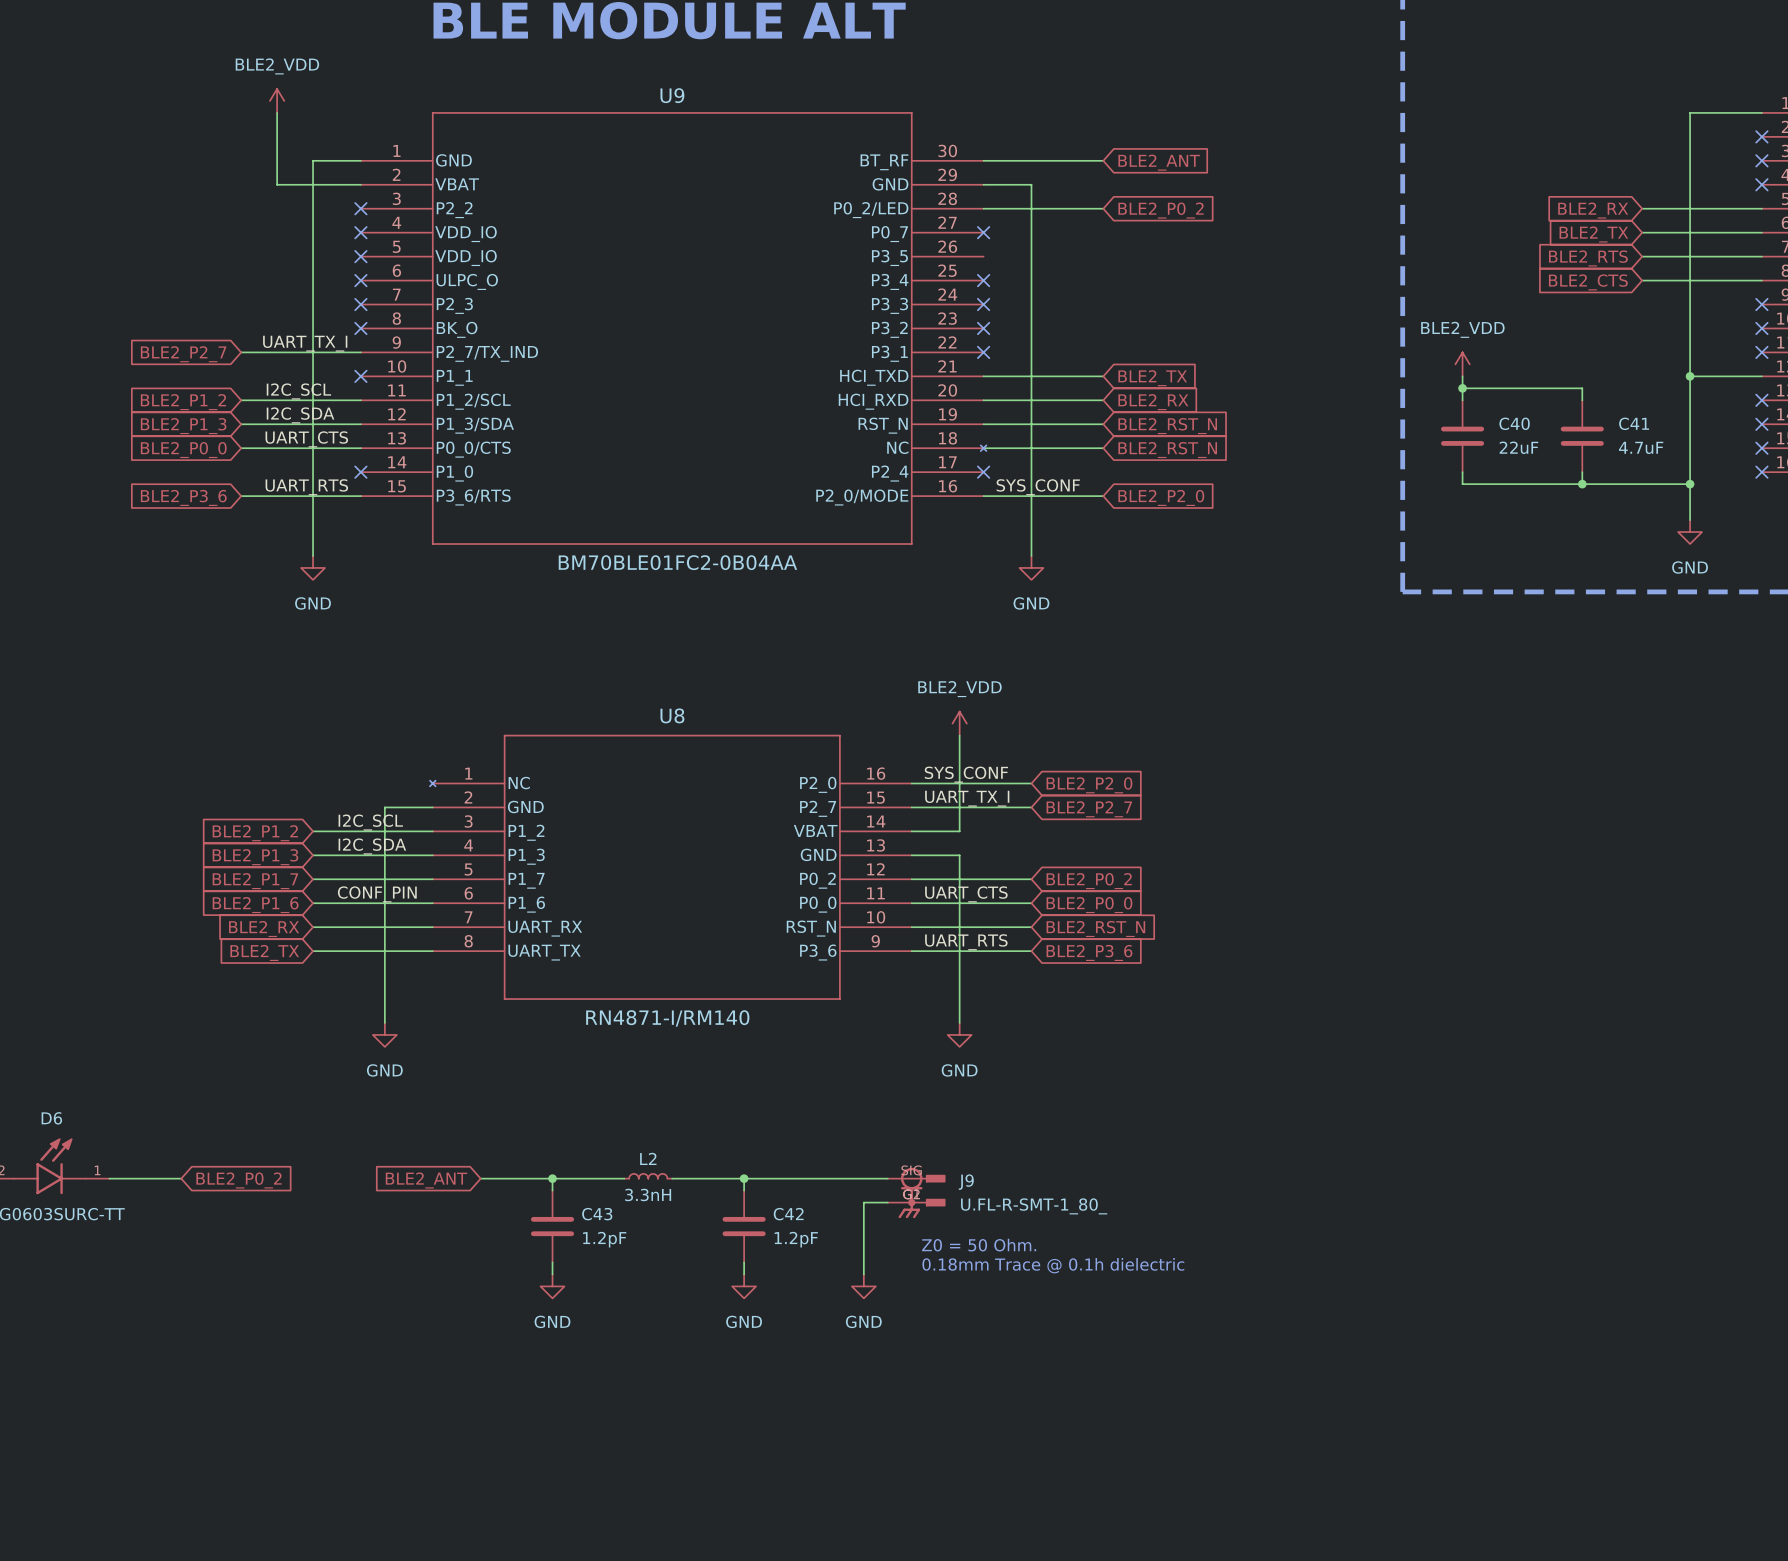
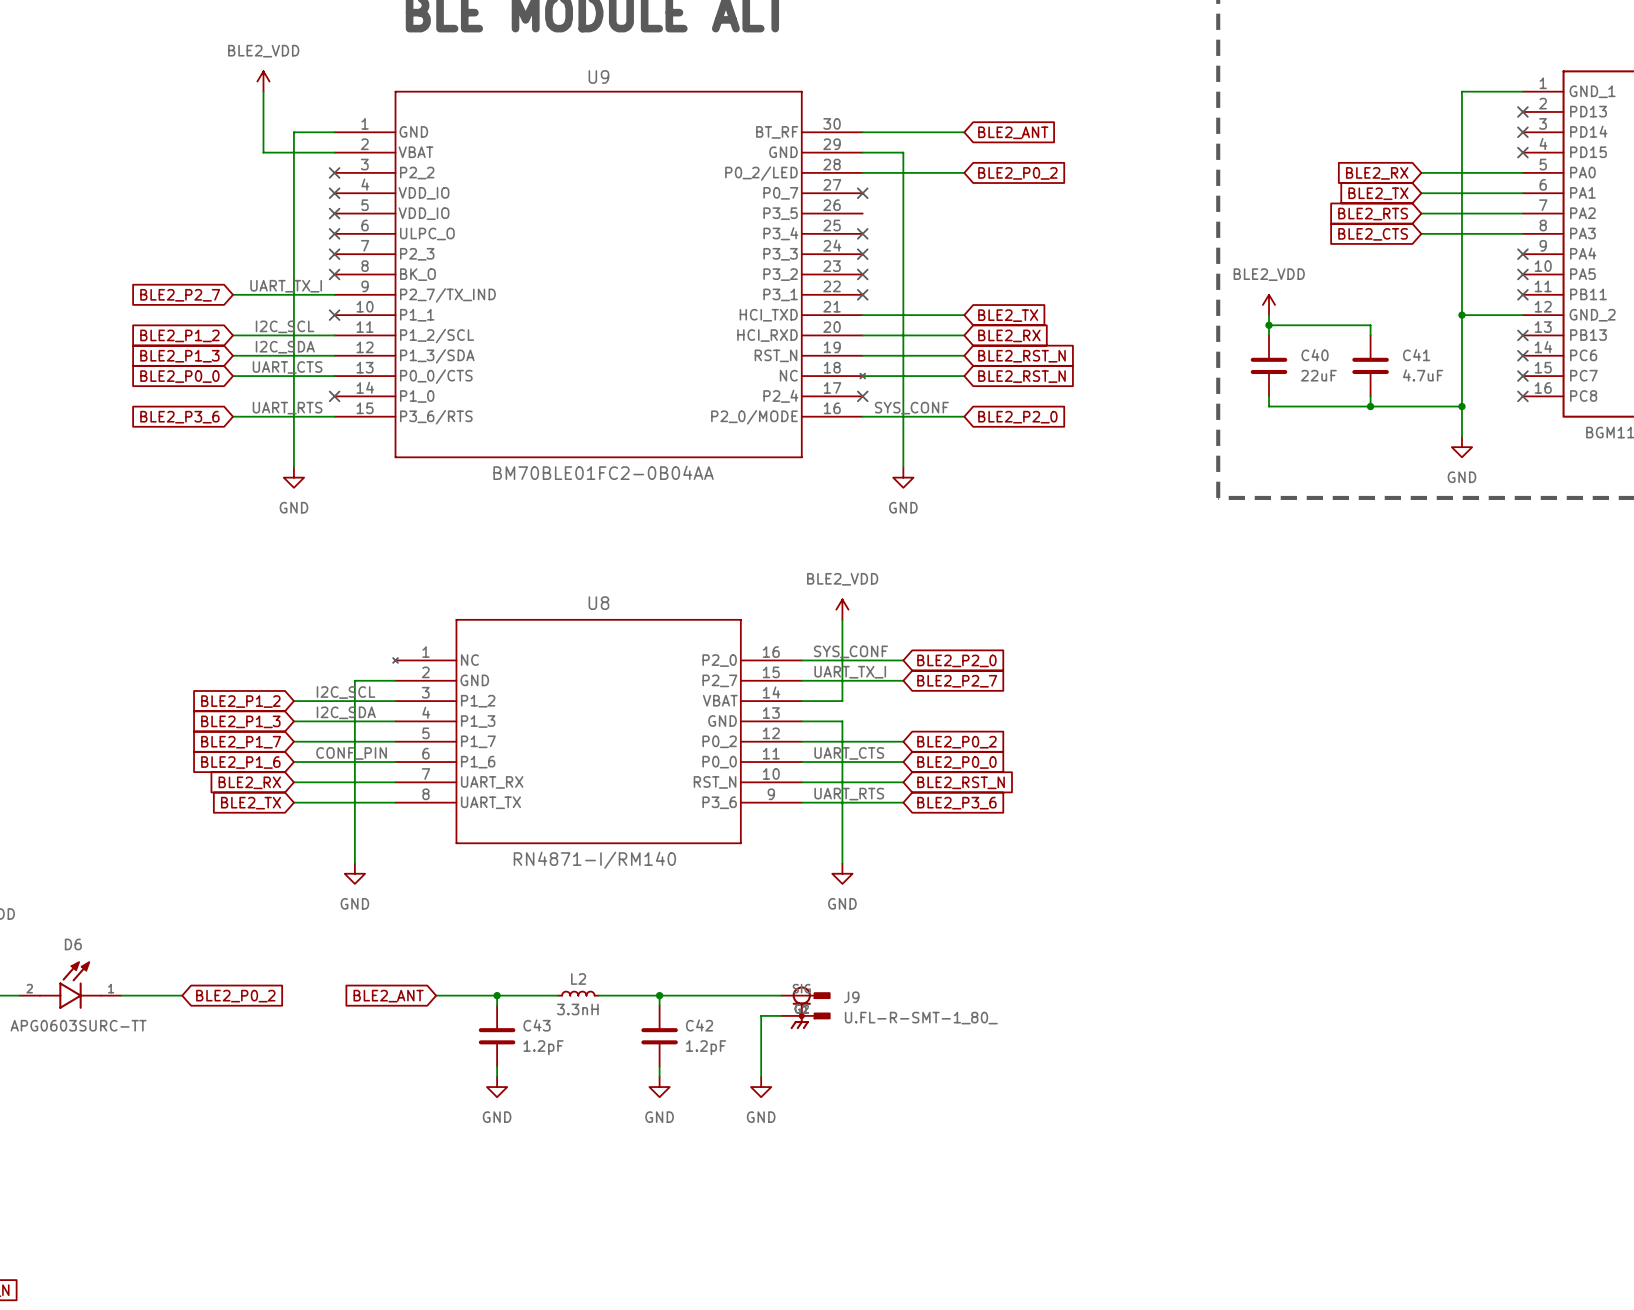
text: Z0 = 50 Ohm. (979, 1245) -> none
text: 0.18mm Trace @ 0.1h dielectric (1053, 1265) -> none

